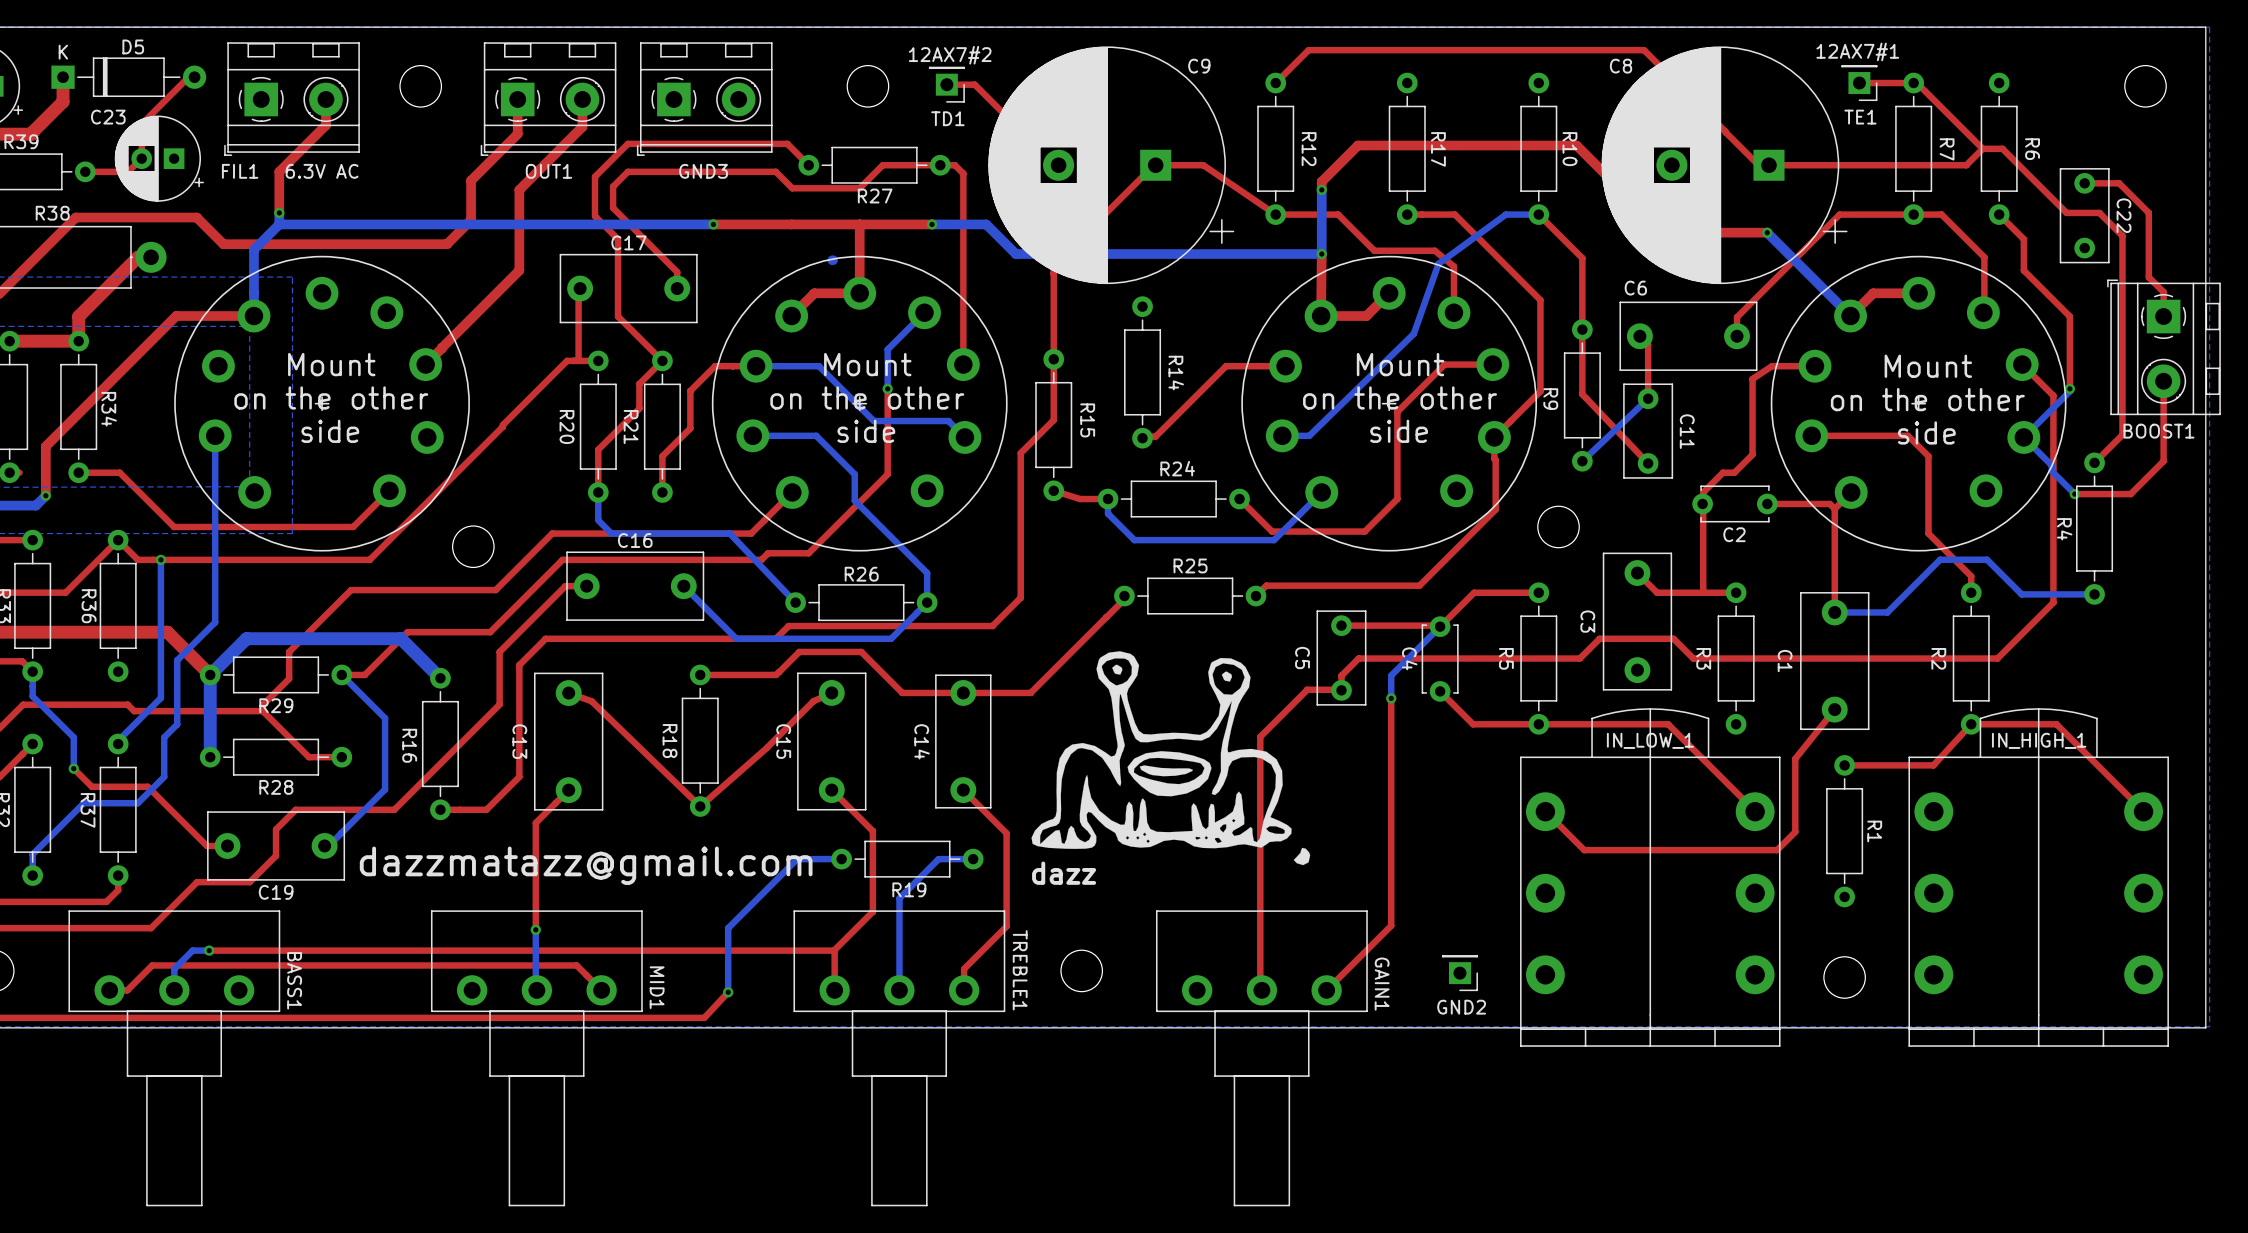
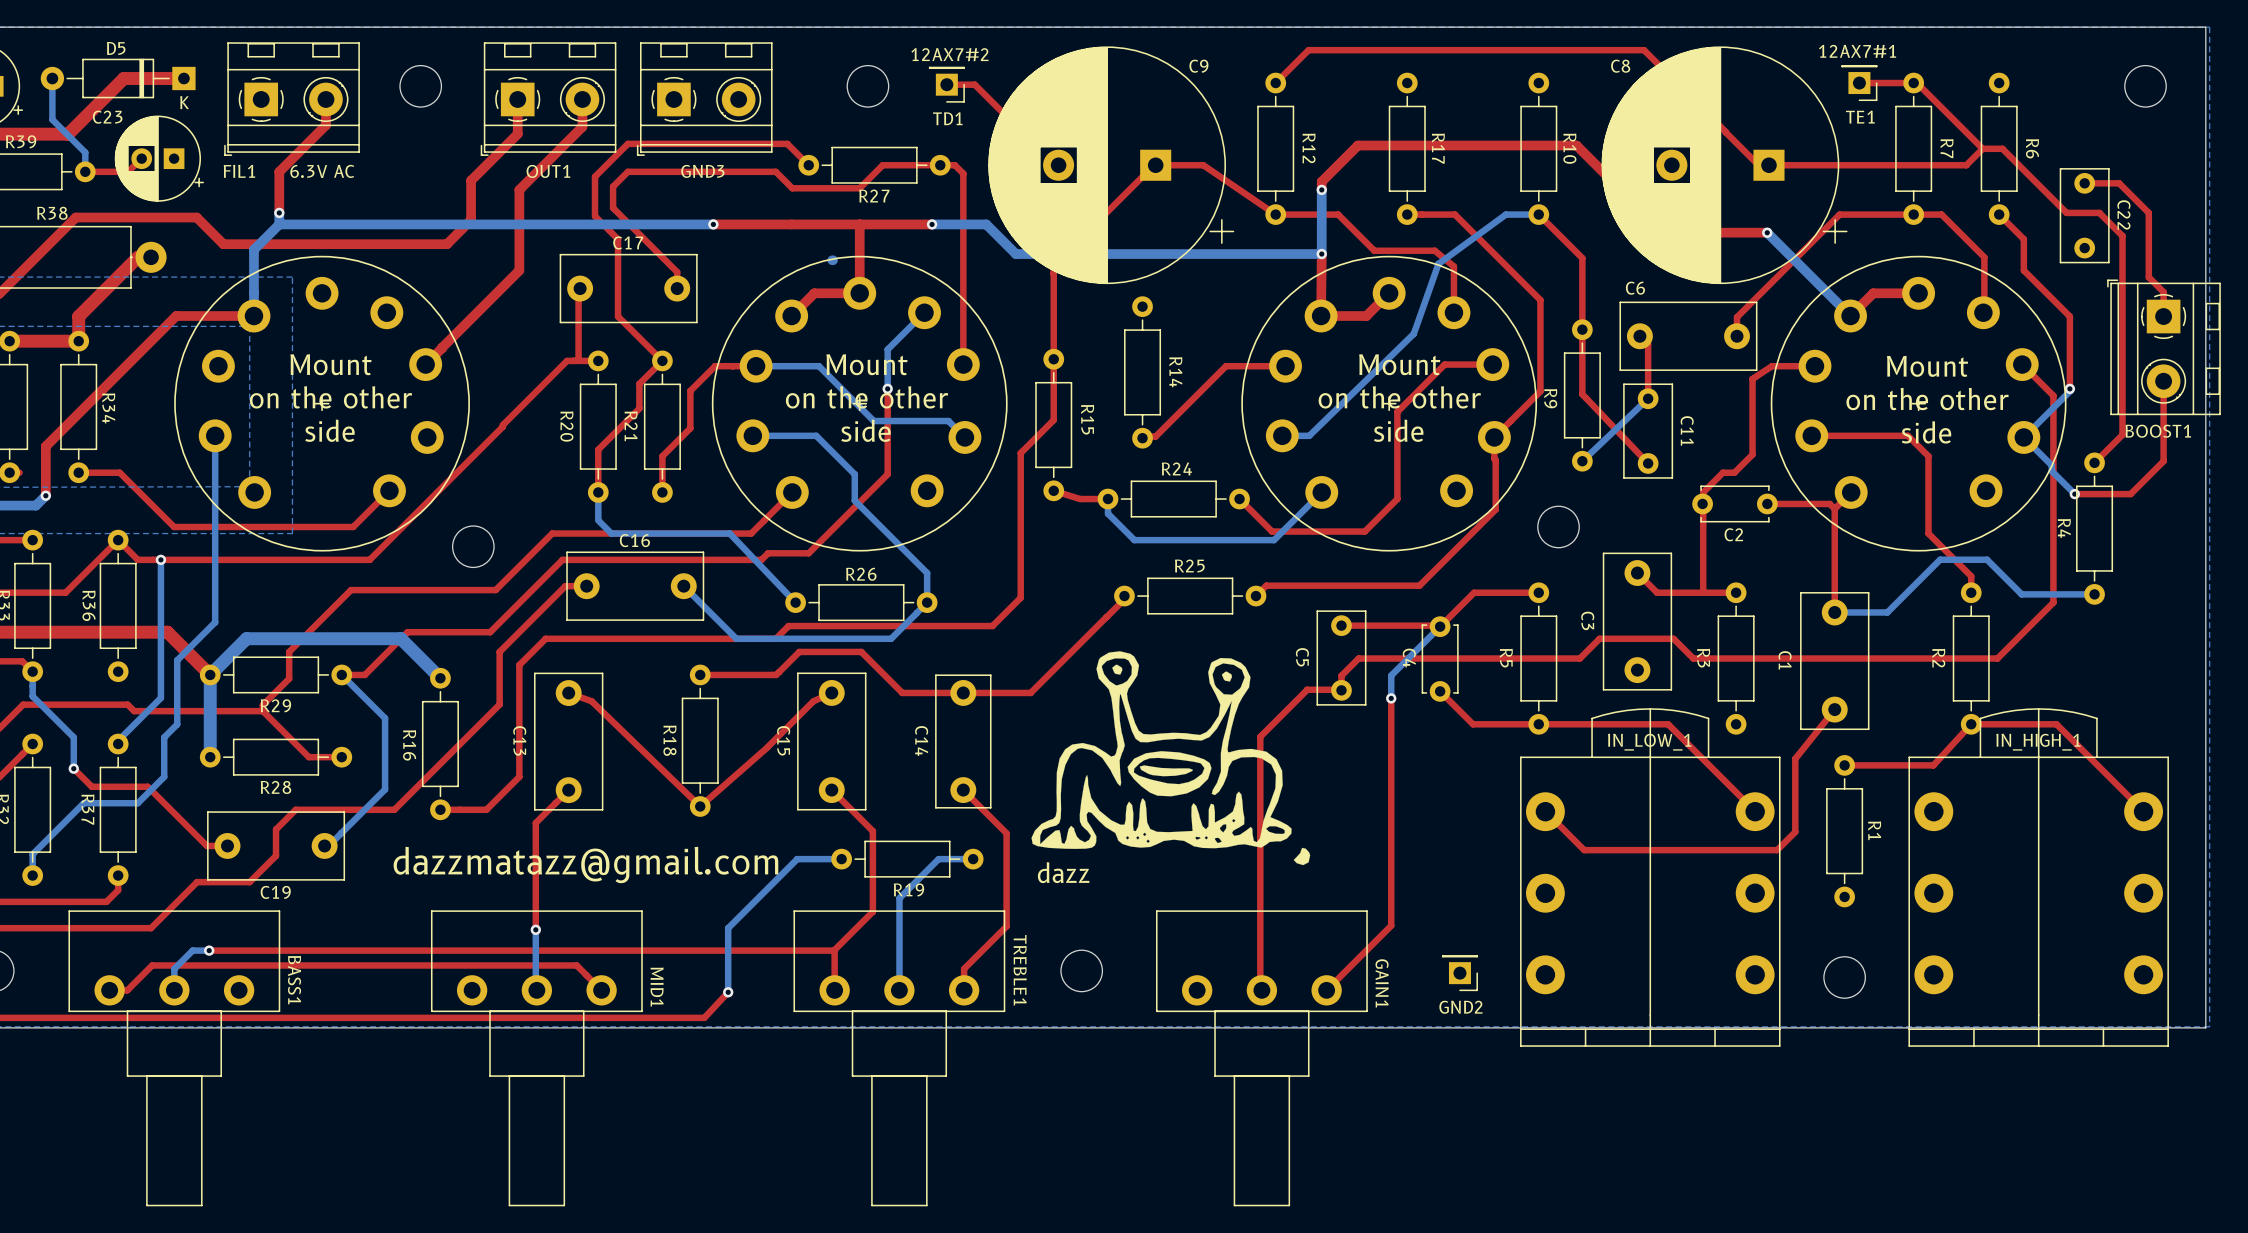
top track: (63, 77) (63, 101) (31, 134) -> (183, 78) (123, 78) (68, 134) (31, 134)
D5 rotation: 0° (128, 77) -> 180° (118, 78)
top track: (194, 77) (188, 77) (141, 124) (141, 158) -> none
bottom track: none -> (52, 78) (52, 119) (85, 152) (85, 171)

